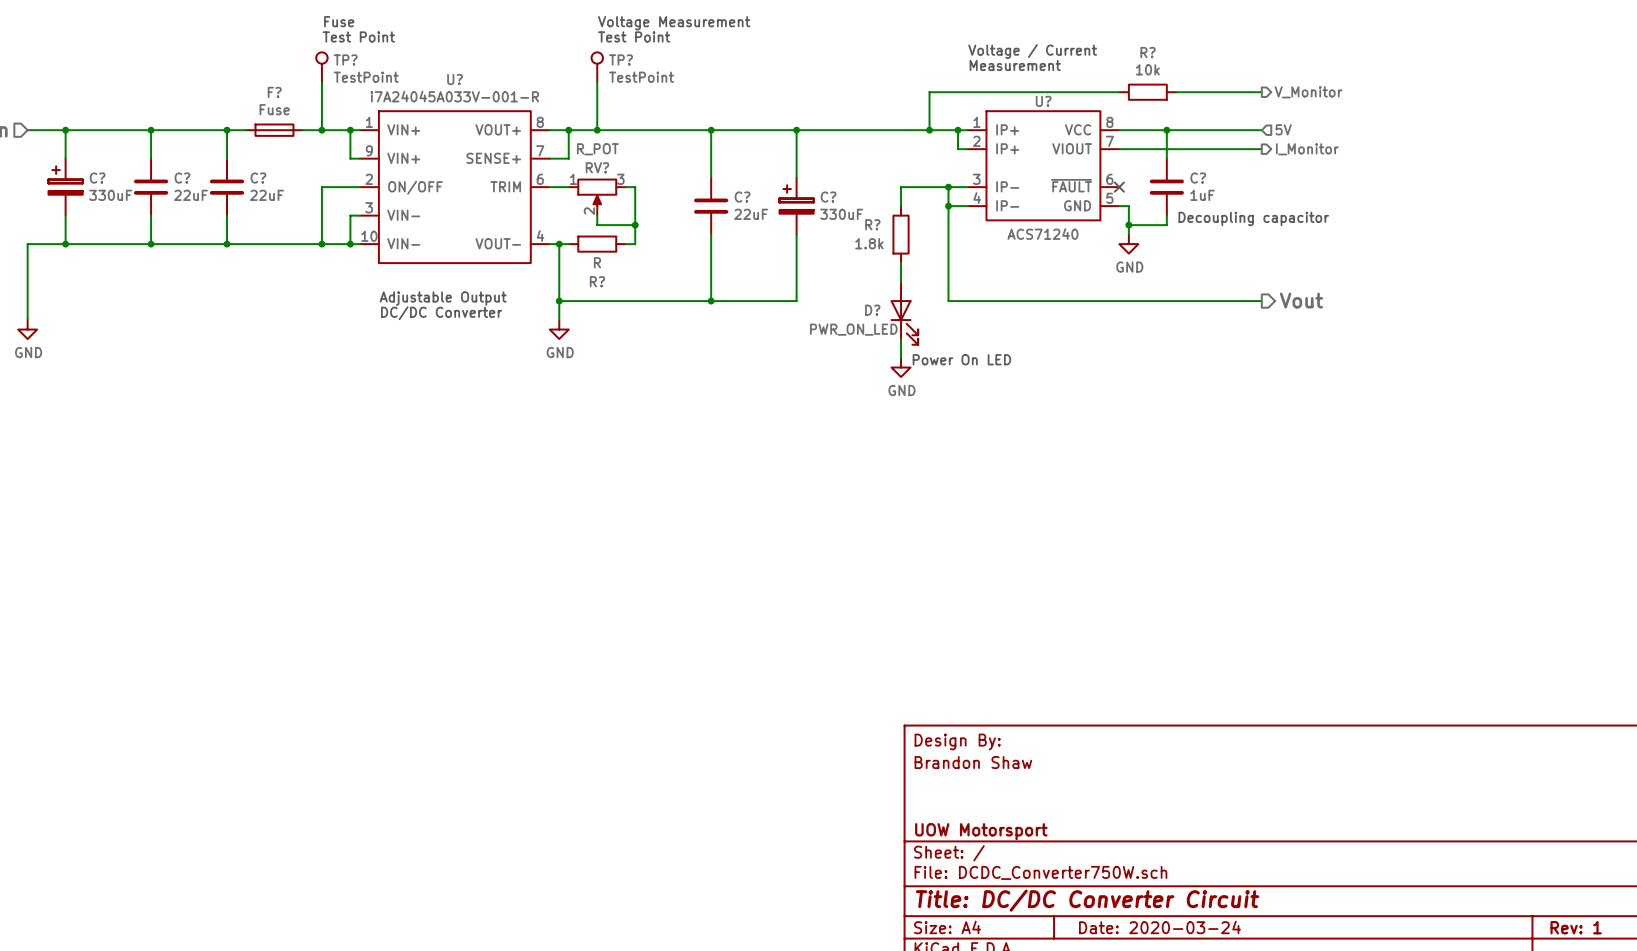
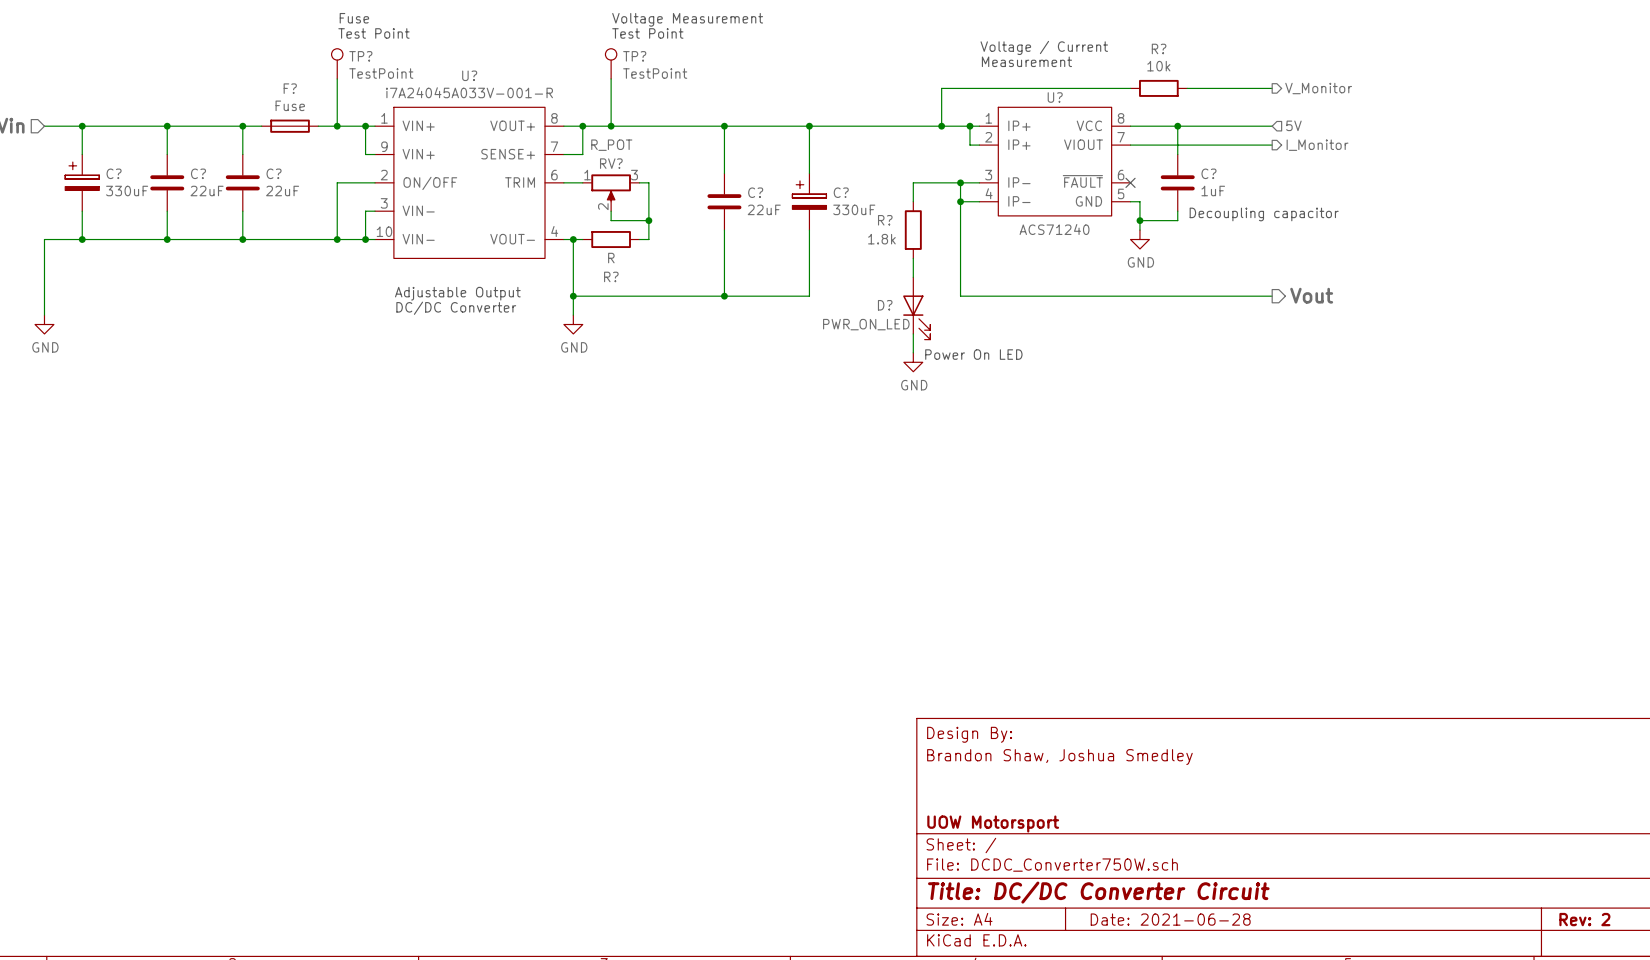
title block: Brandon Shaw (973, 762) -> Brandon Shaw, Joshua Smedley (1059, 757)
title block: Date: 2020-03-24 (1160, 927) -> Date: 2021-06-28 (1170, 919)
title block: Rev: 1 (1576, 927) -> Rev: 2 (1584, 919)

